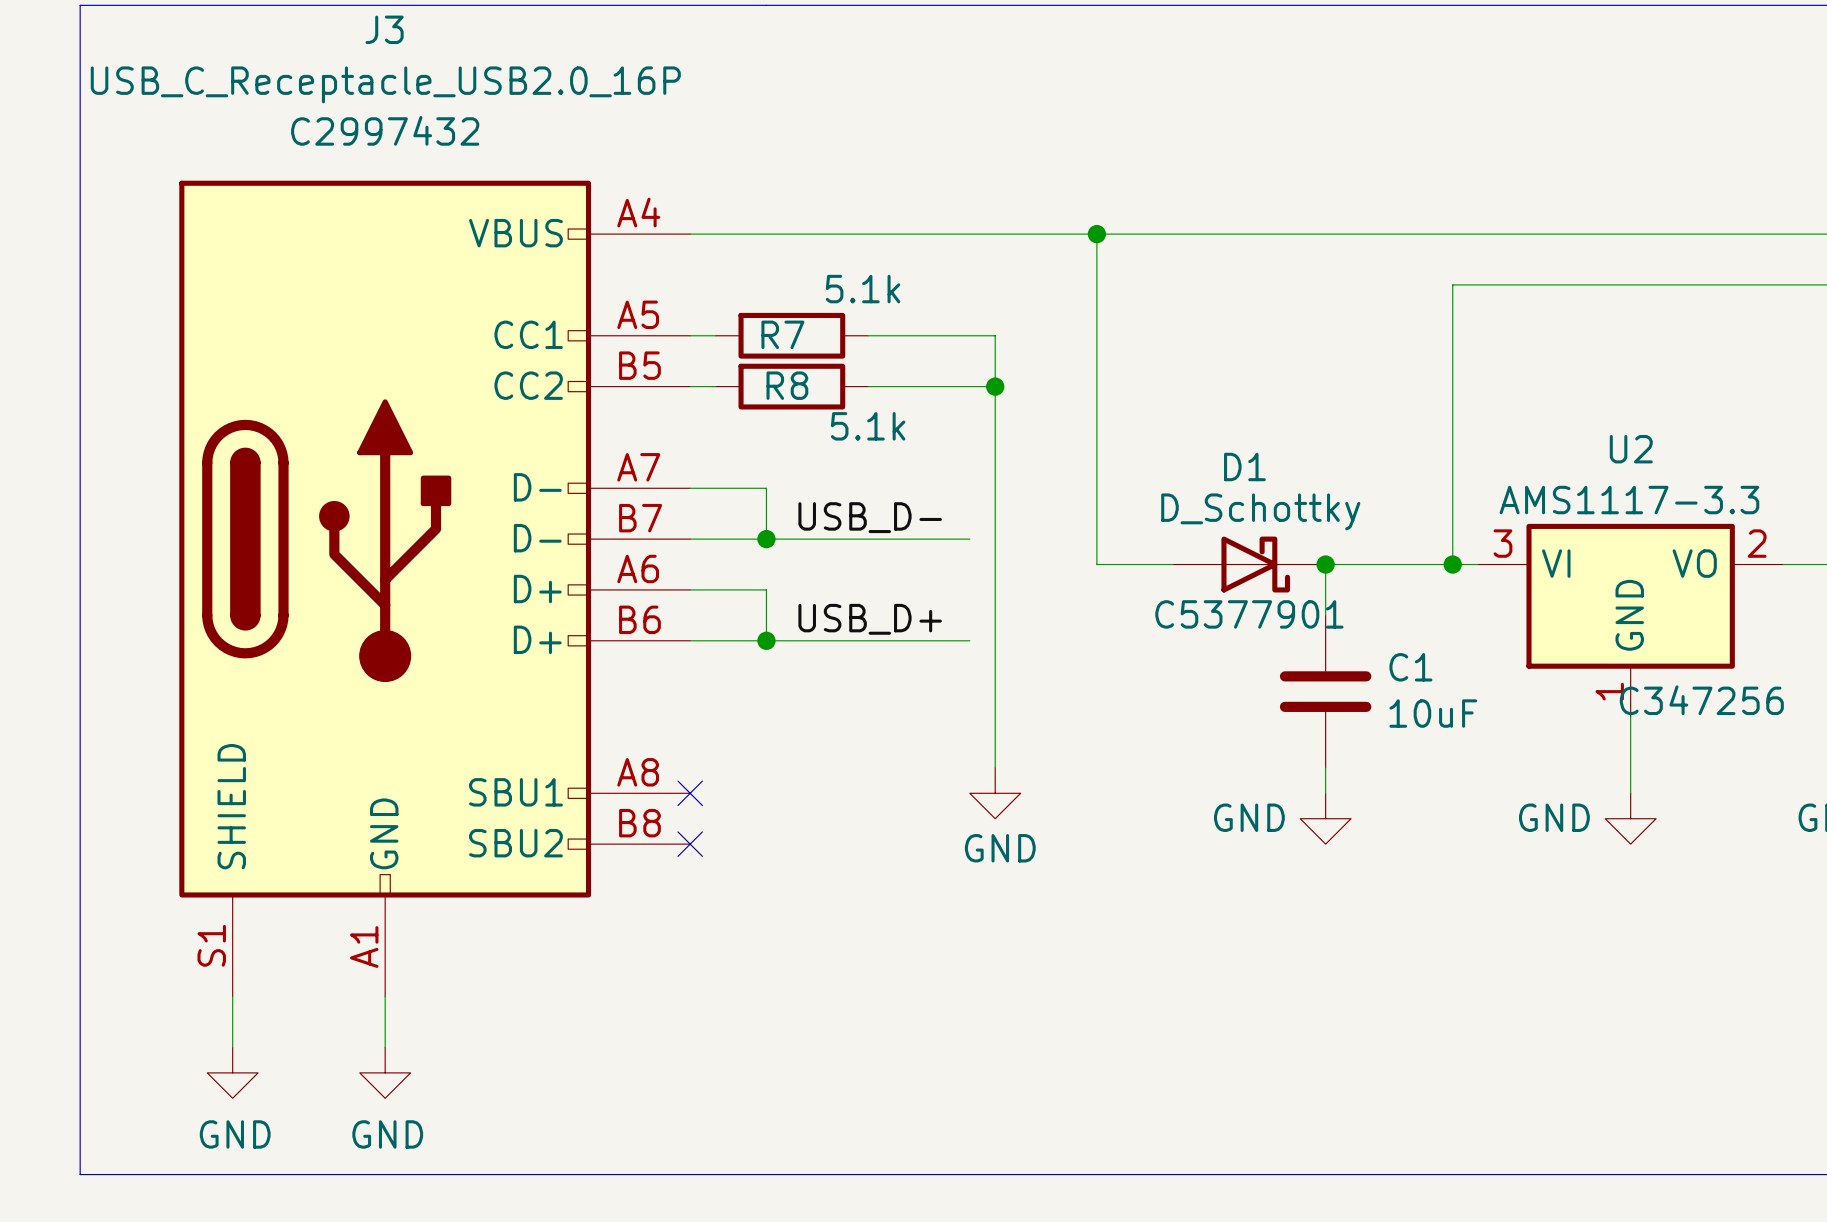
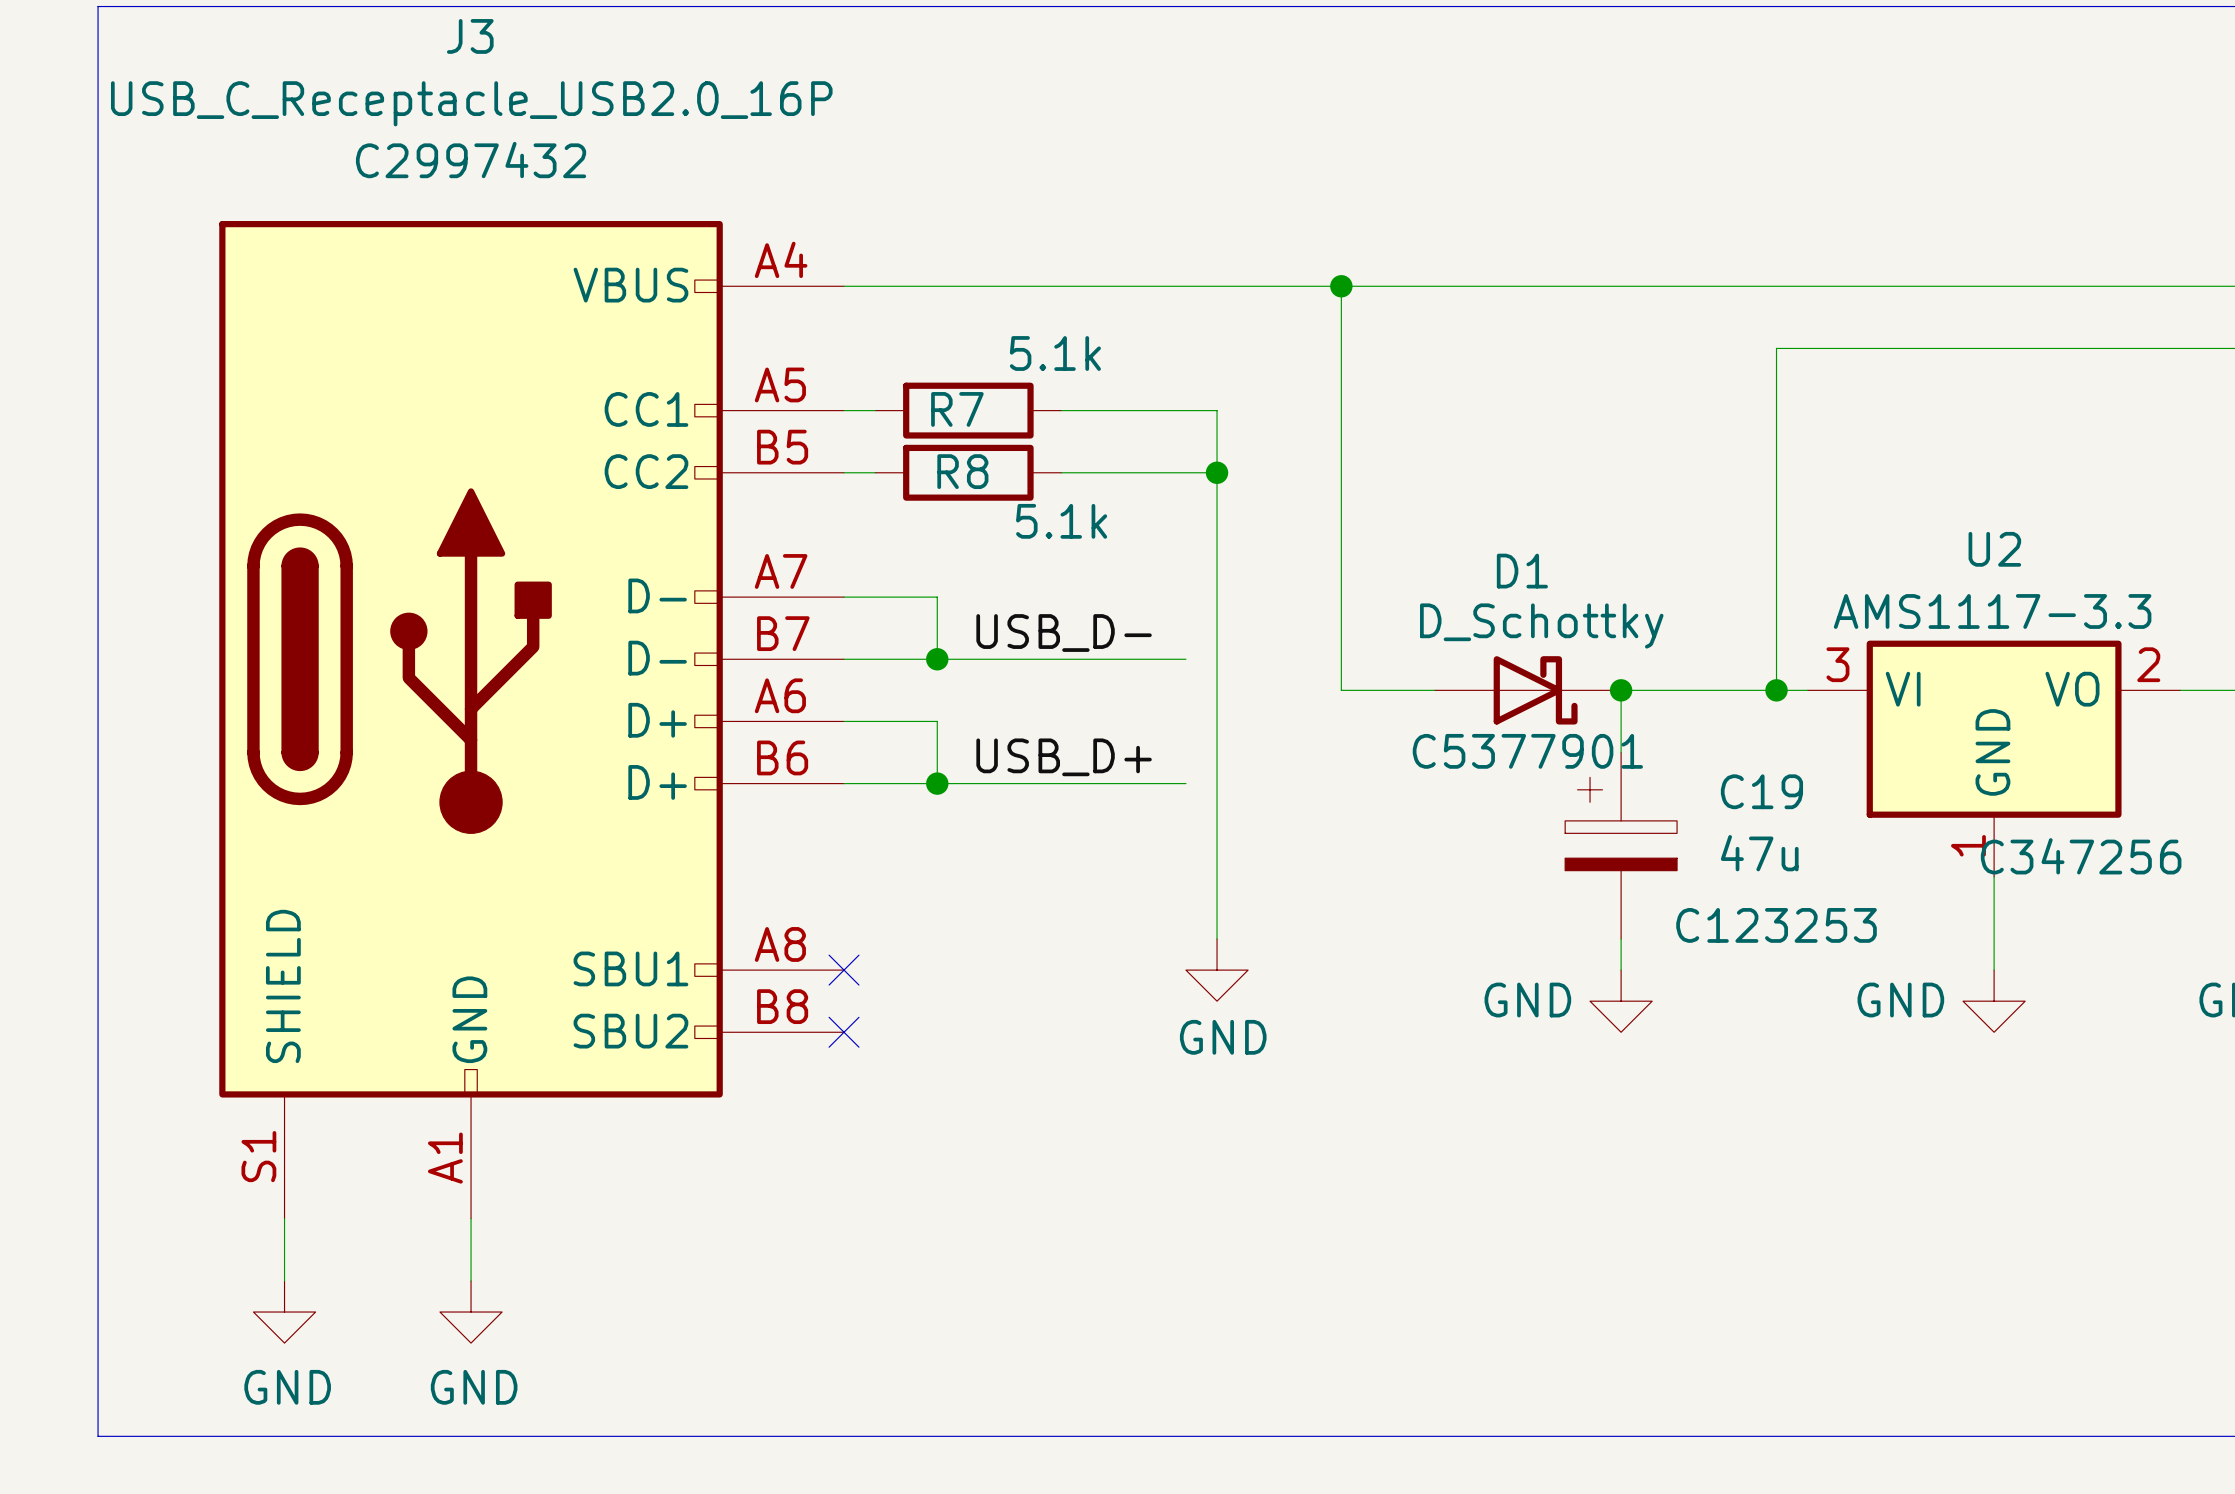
C1: 10uF (1325, 691) -> none
C19: none -> 47u (1621, 845)

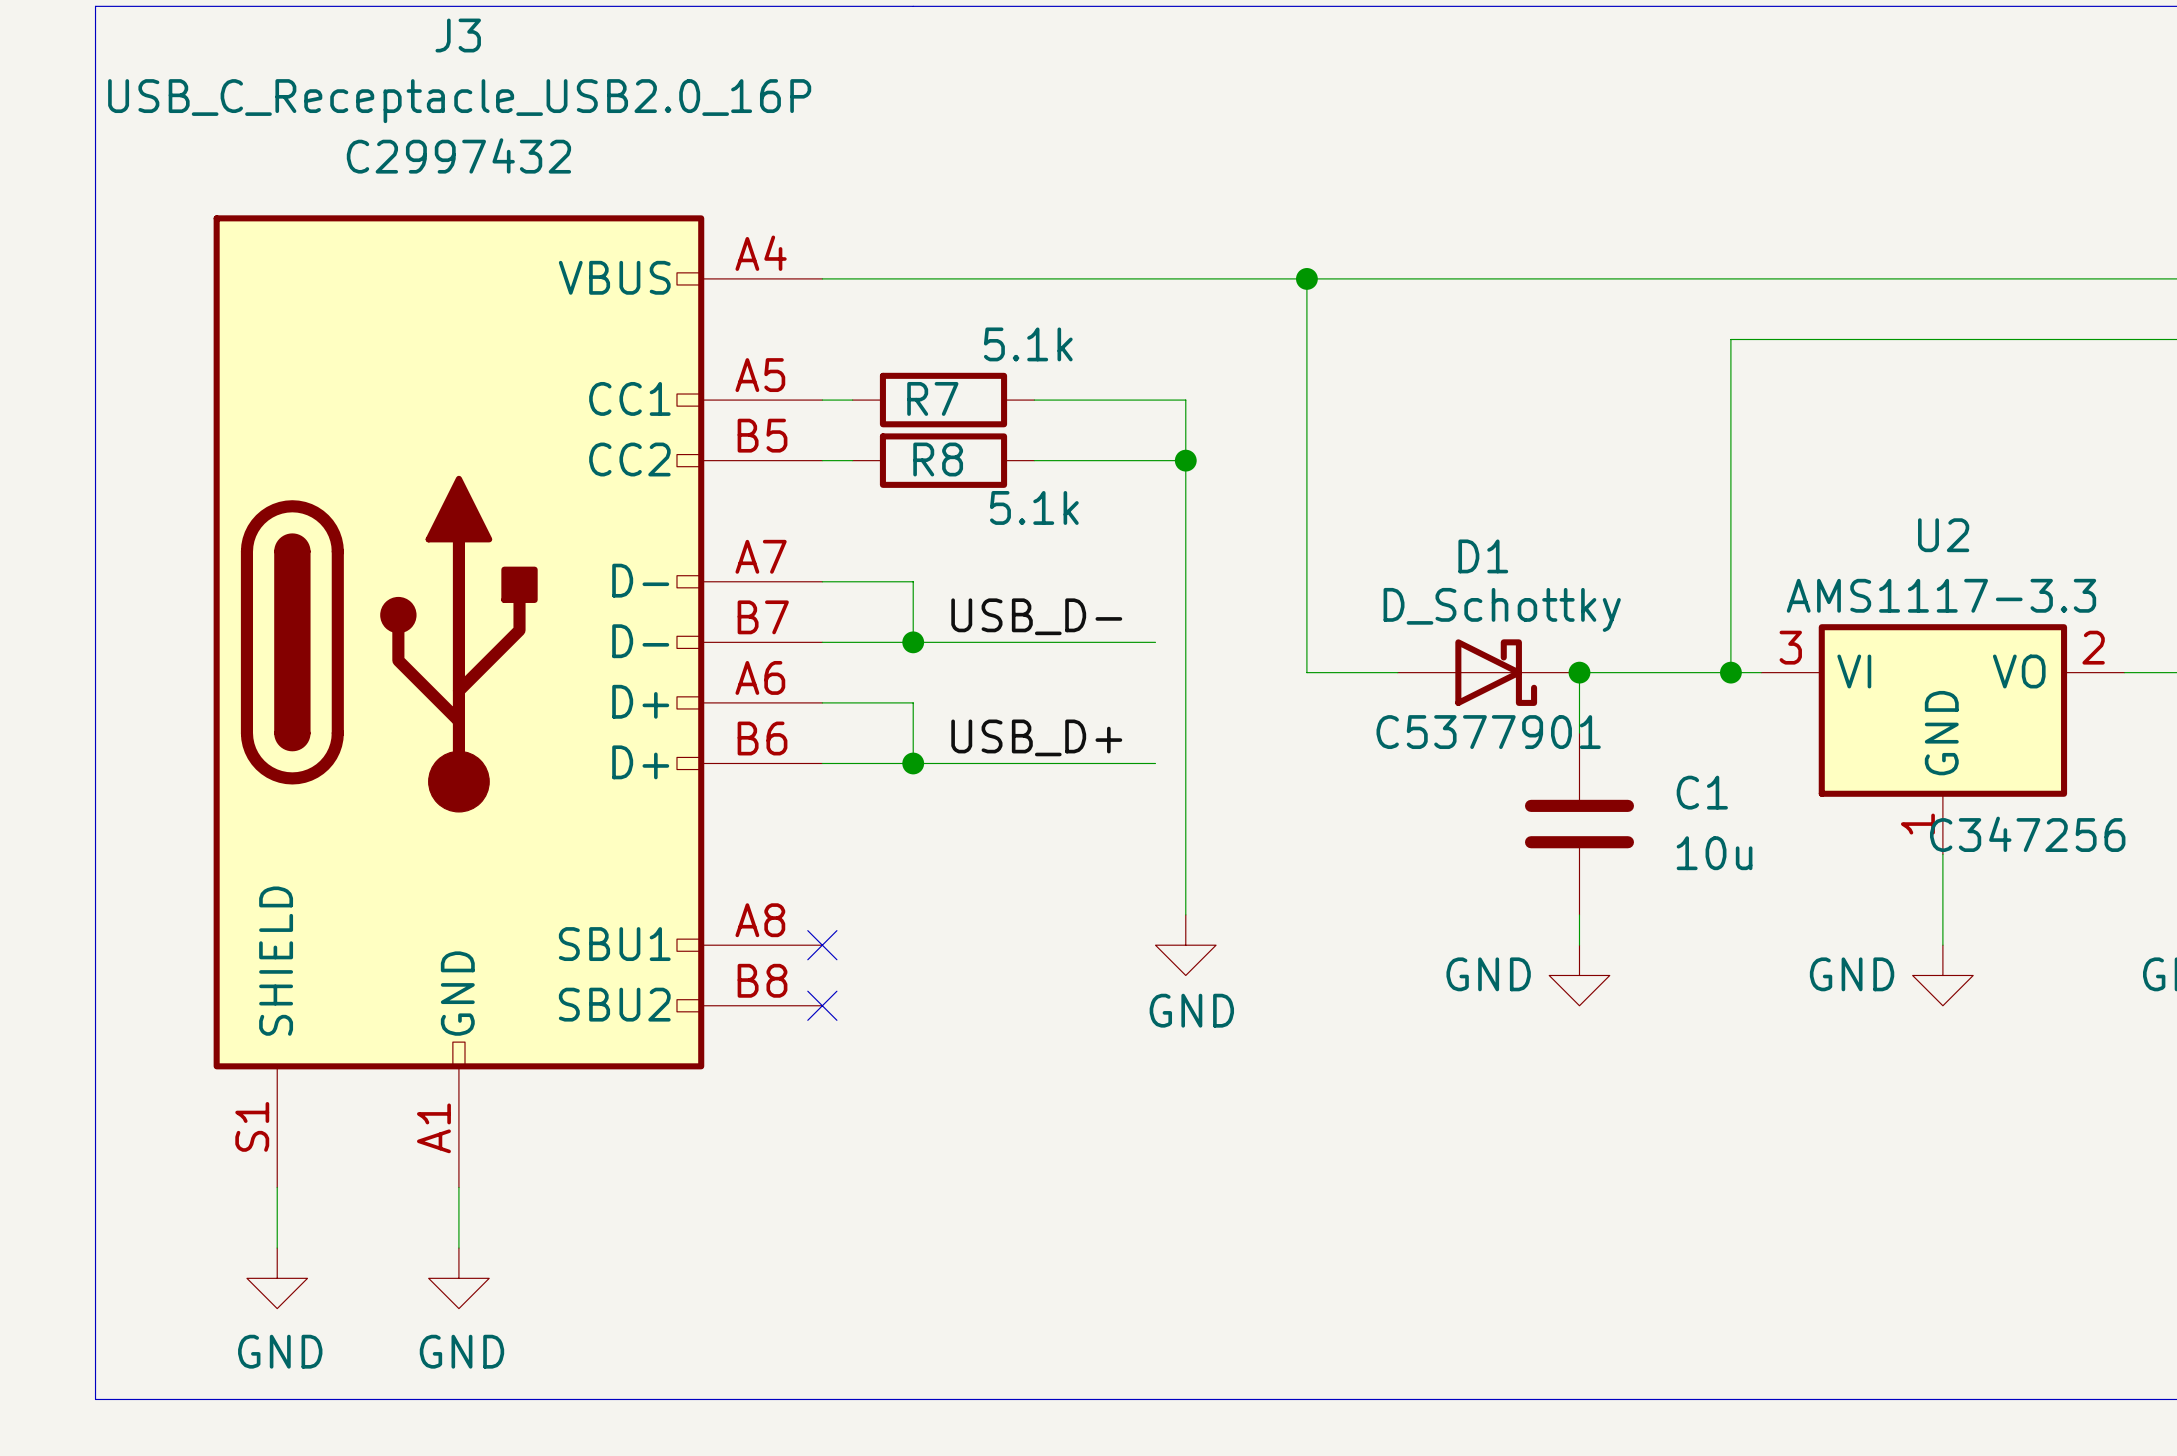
C19: 47u (1621, 845) -> none
C1: none -> 10u (1579, 824)

